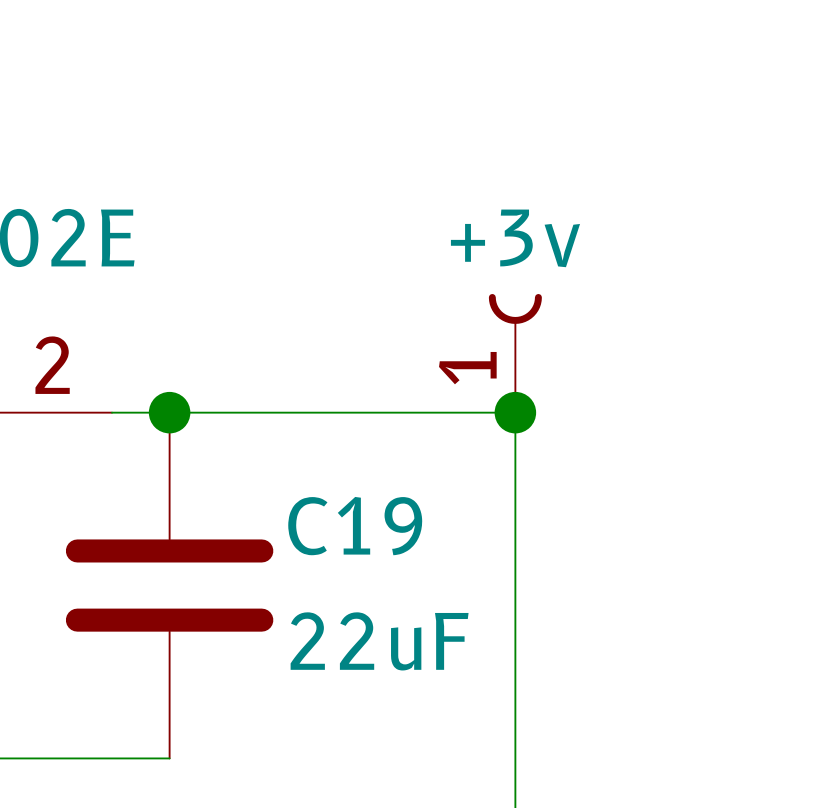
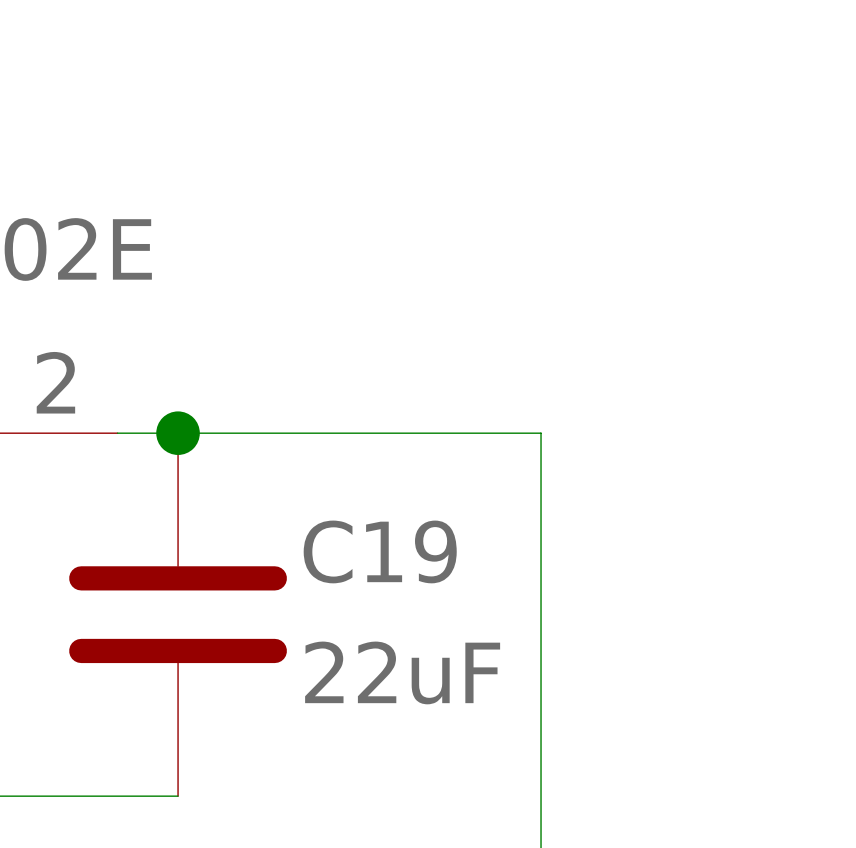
part: +3v (515, 353) -> none
junction: (515, 412) -> none

